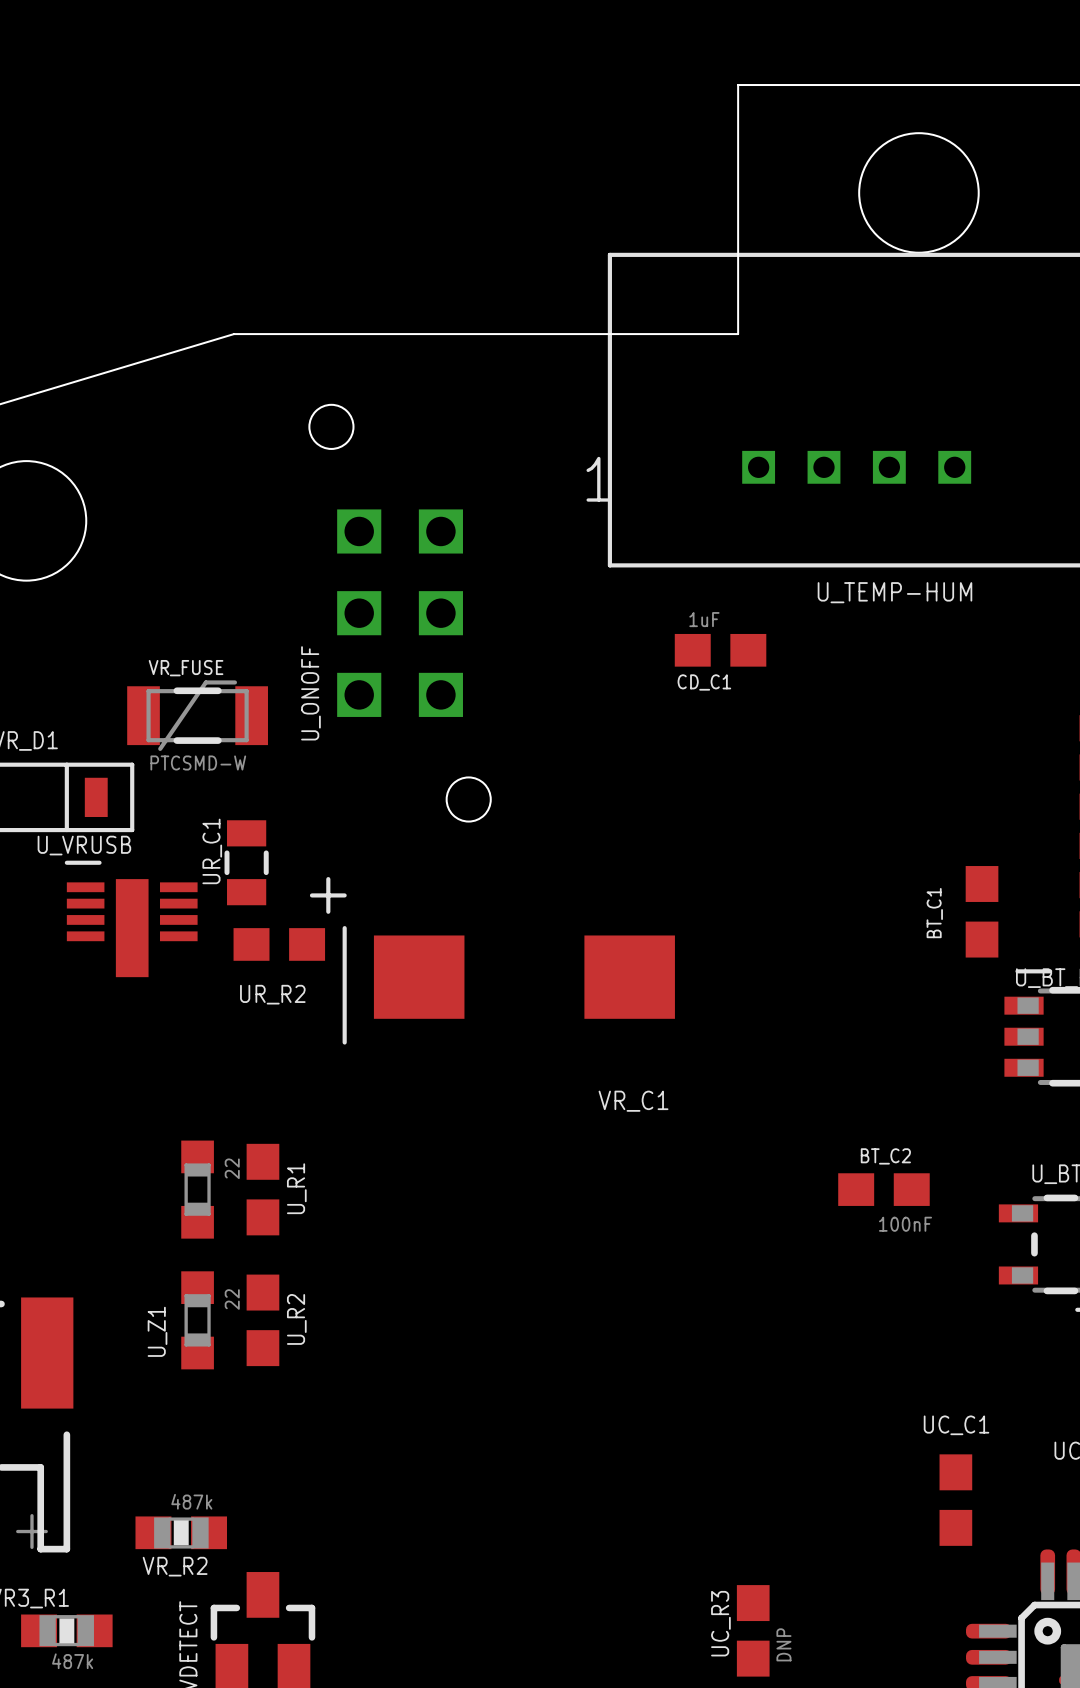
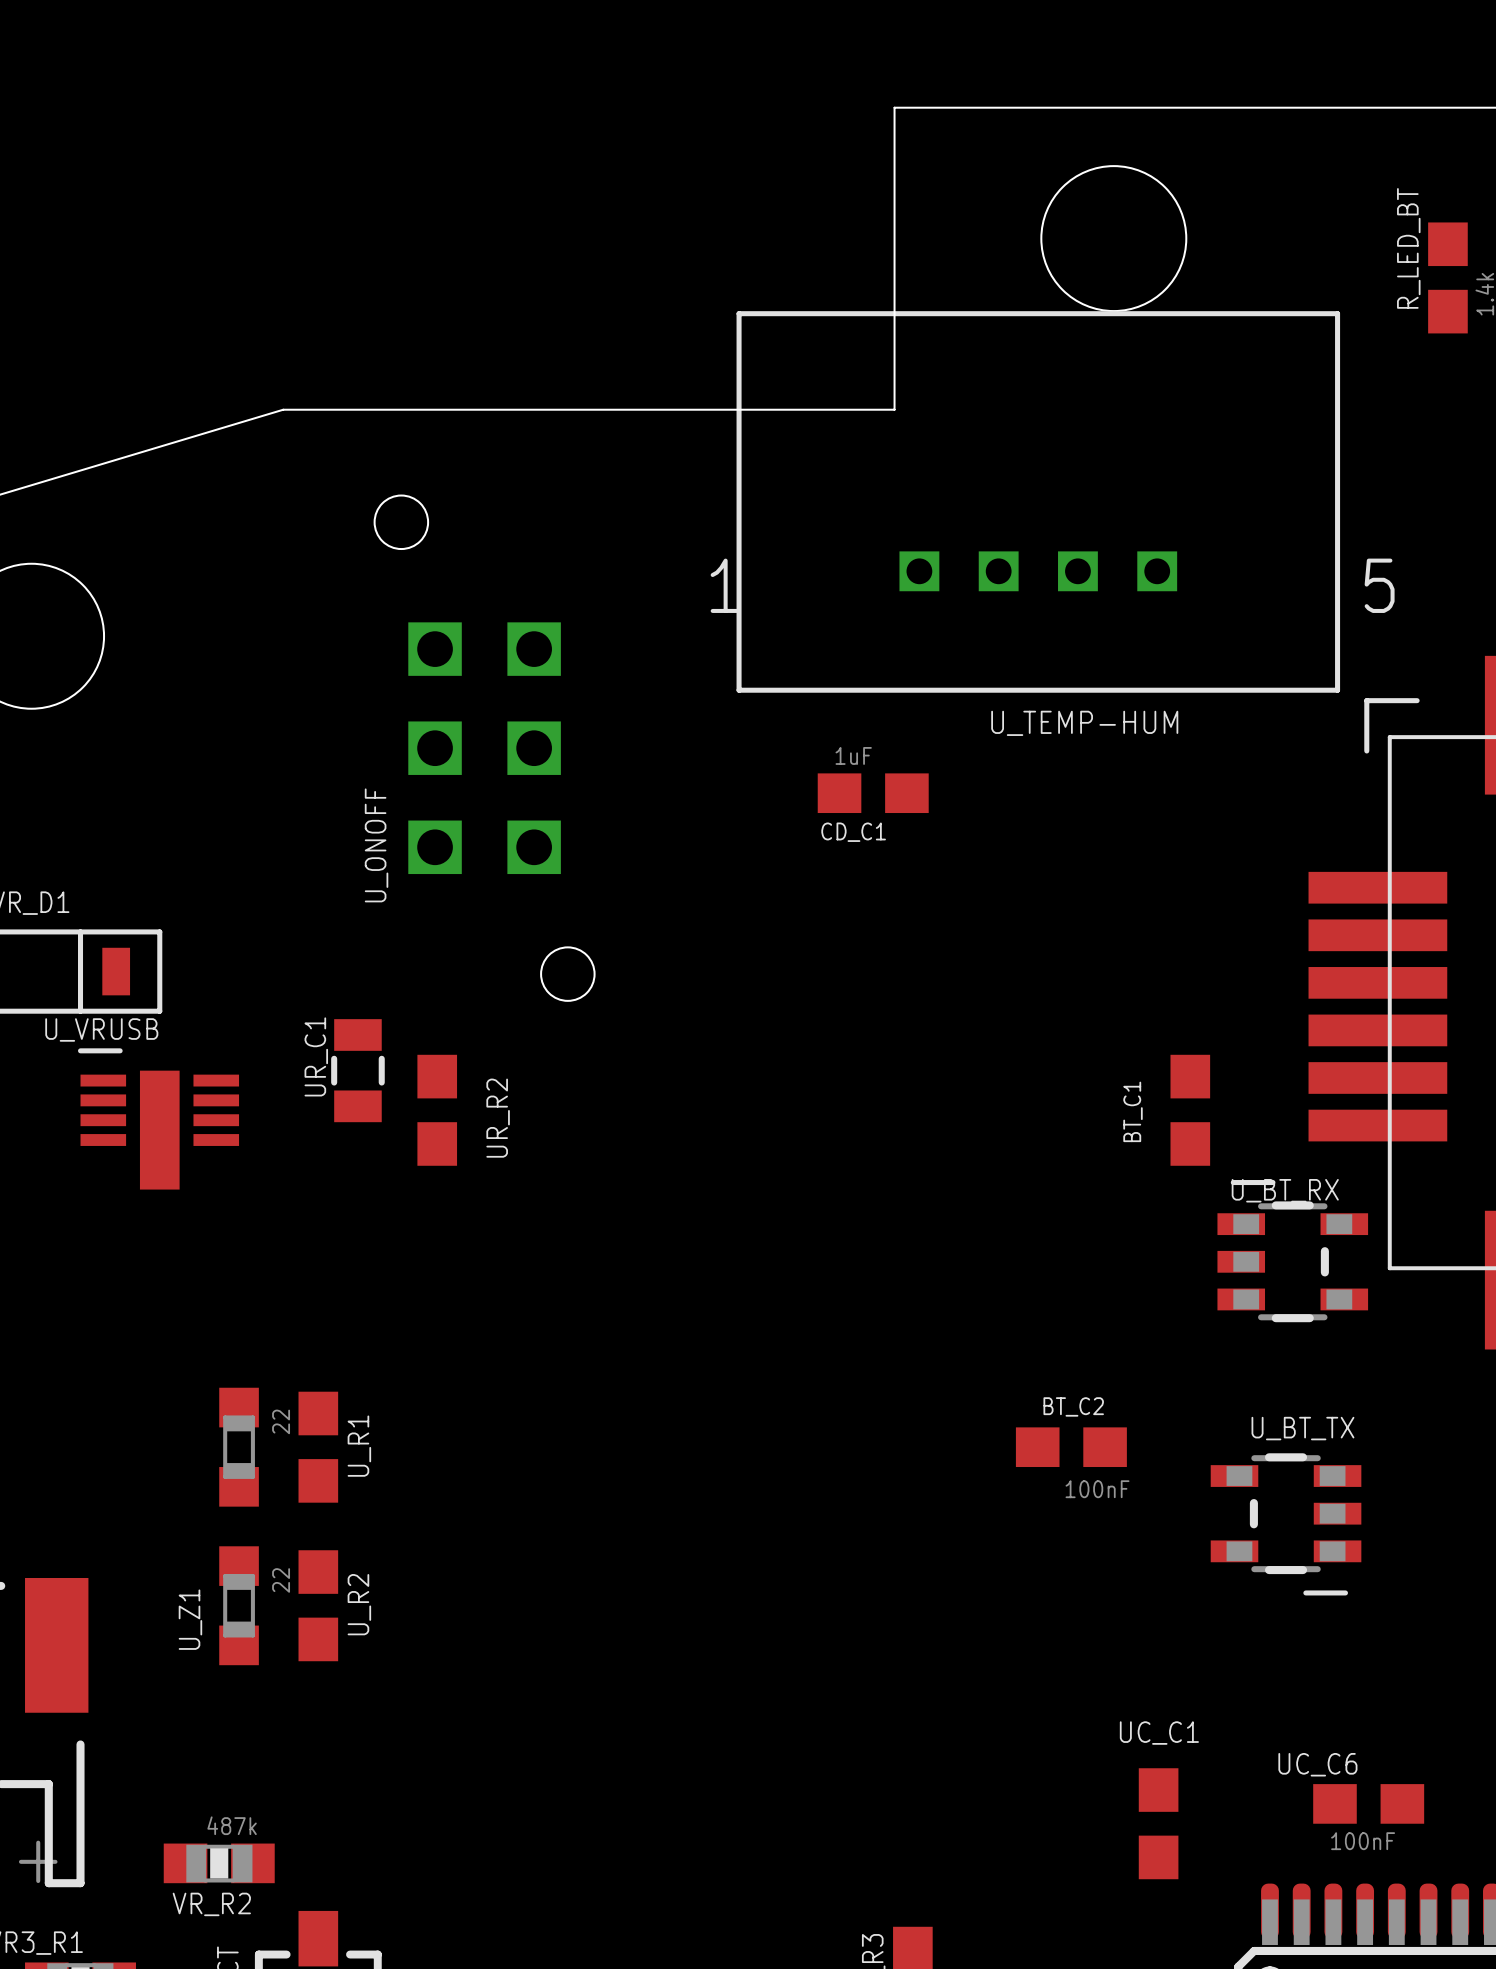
VR_FUSE: PTCSMD-W (197, 715) -> none
UR_C1 position: (246, 862) -> (357, 1070)
UR_R2 rotation: 0° (279, 944) -> 90° clockwise (437, 1110)
UR_R2 position: (279, 944) -> (437, 1110)
VR_C1: (492, 960) -> none
UR_R2 name position: UR_R2 (272, 994) -> UR_R2 (498, 1118)

